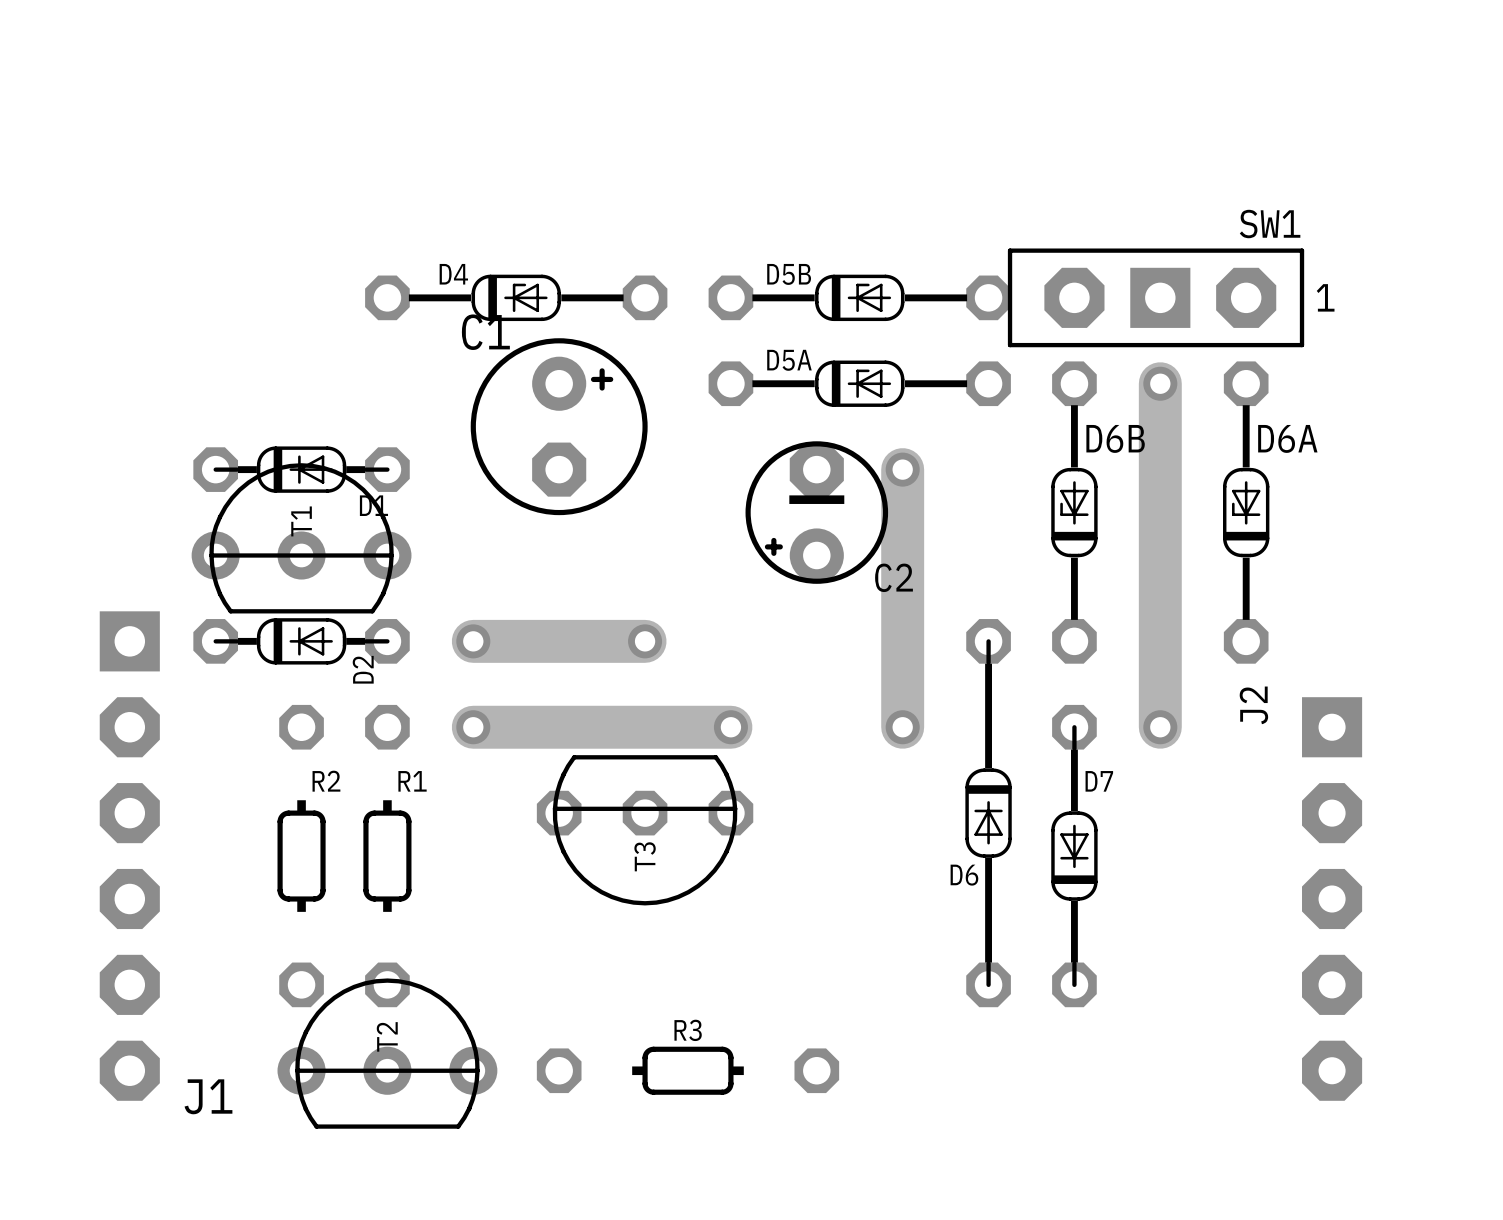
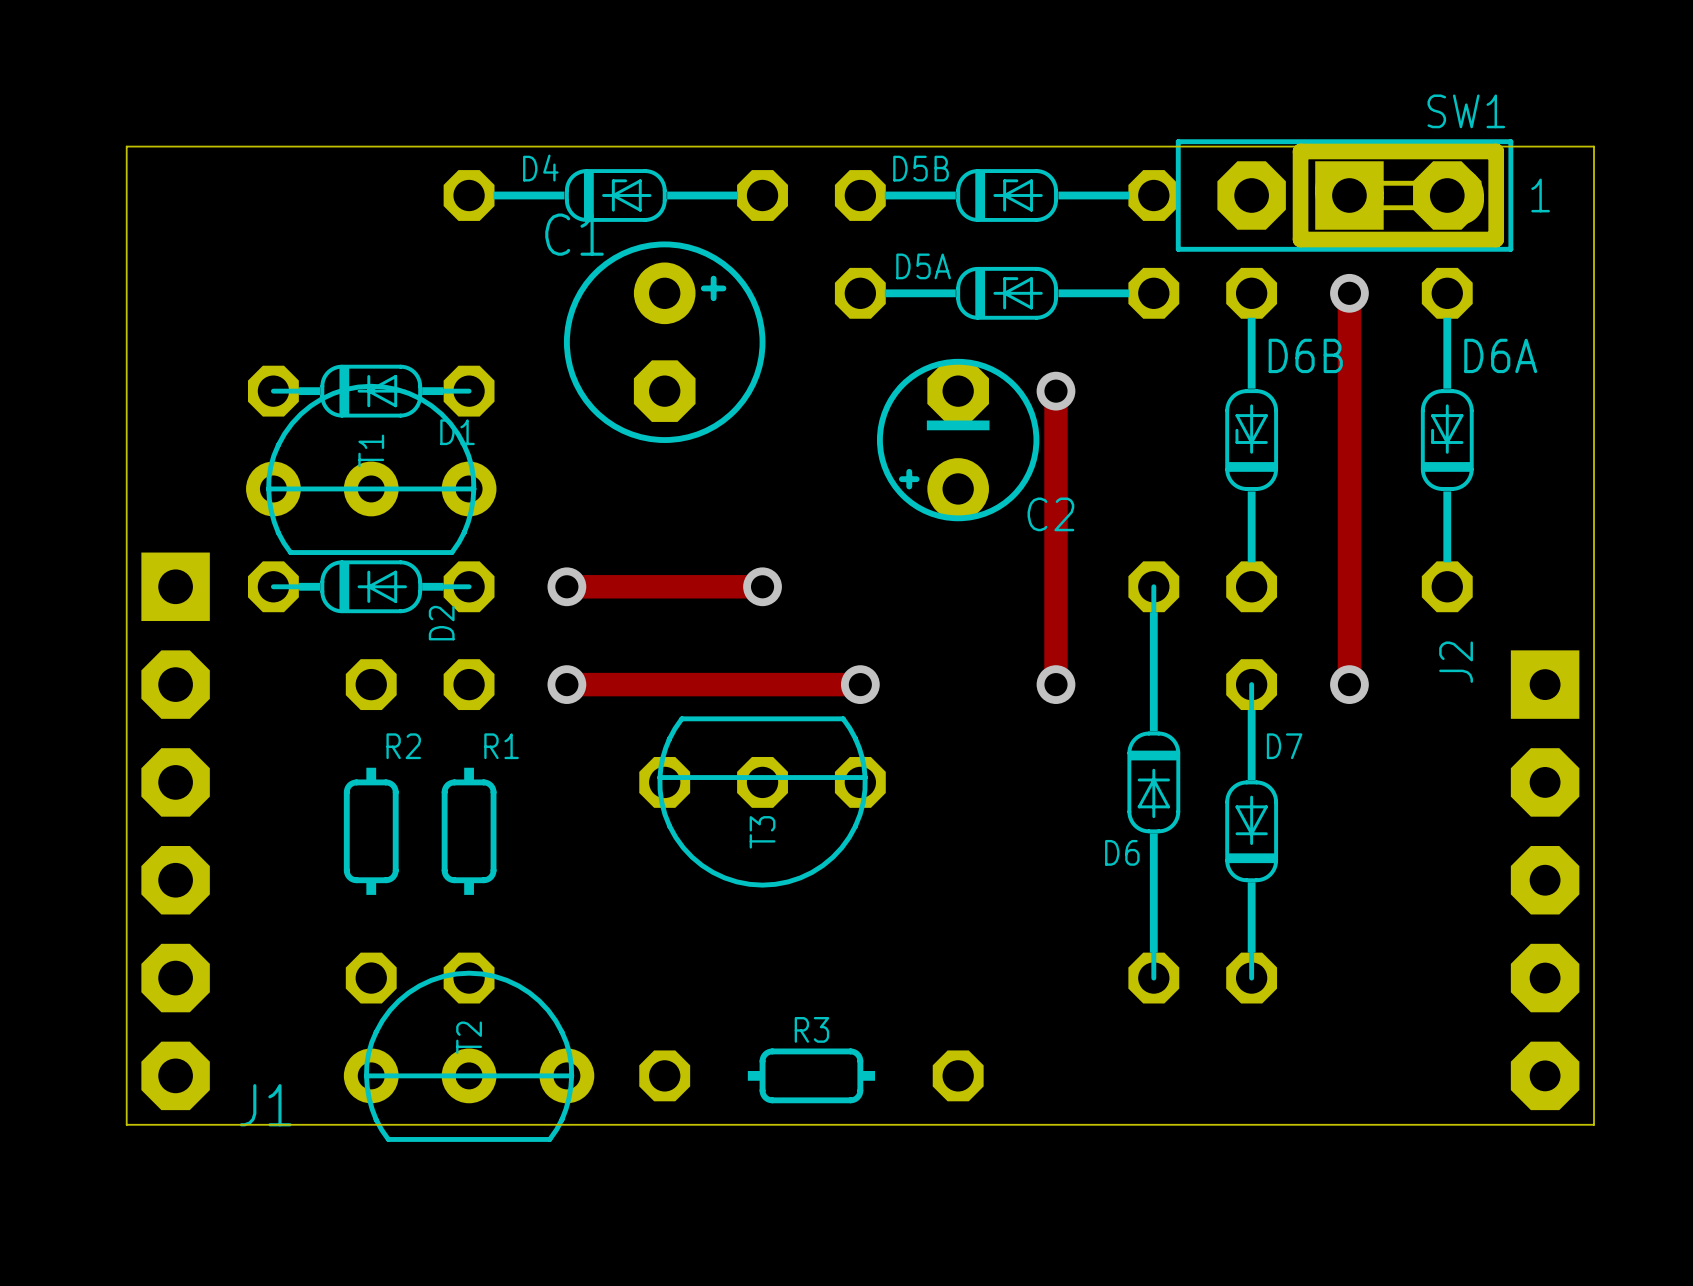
SW1 footprint: [1007, 248, 1305, 348] -> [1175, 139, 1514, 252]
board edge: none -> (126, 146) (1594, 146) (1594, 1124) (126, 1124) (126, 146)
track width: thick (1160, 383) (1160, 727) -> thin (1349, 293) (1349, 684)
track width: thick (902, 469) (902, 727) -> thin (1055, 391) (1055, 684)
track width: thick (473, 641) (645, 641) -> thin (566, 586) (762, 586)
track width: thick (473, 727) (730, 727) -> thin (566, 684) (860, 684)

